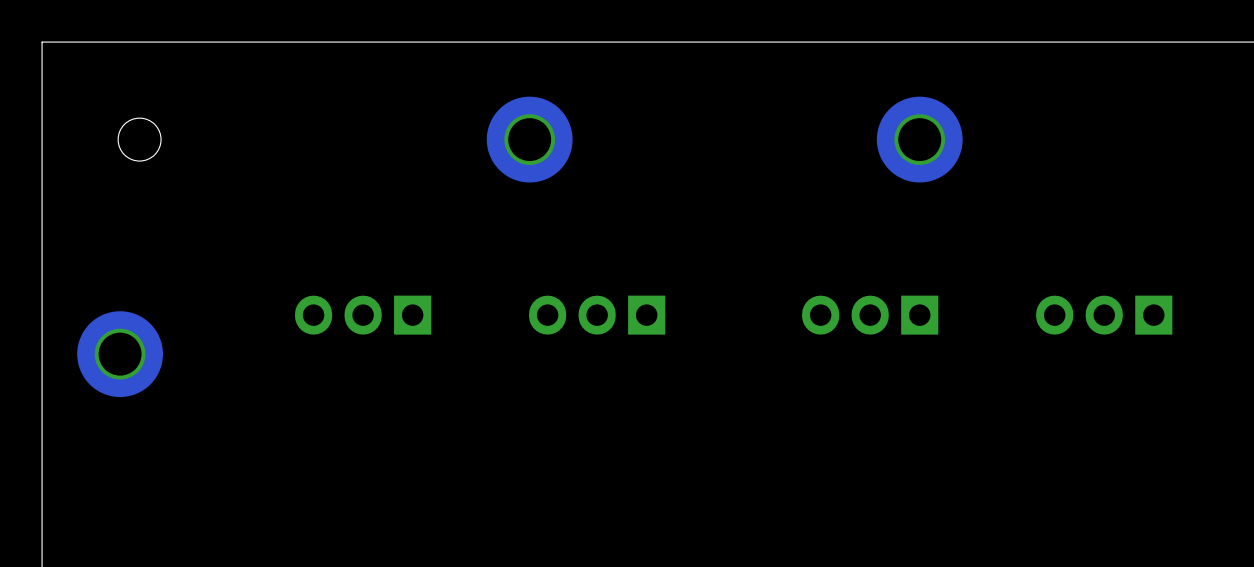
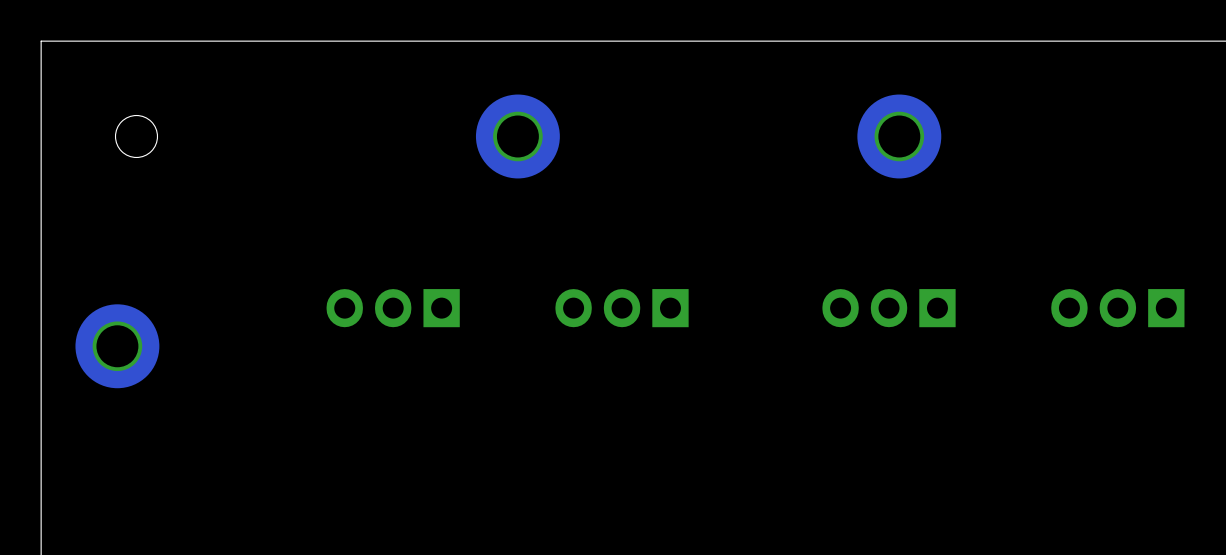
part position: (363, 315) -> (393, 308)
part position: (597, 315) -> (622, 308)
part position: (870, 315) -> (889, 308)
part position: (1104, 315) -> (1117, 308)

